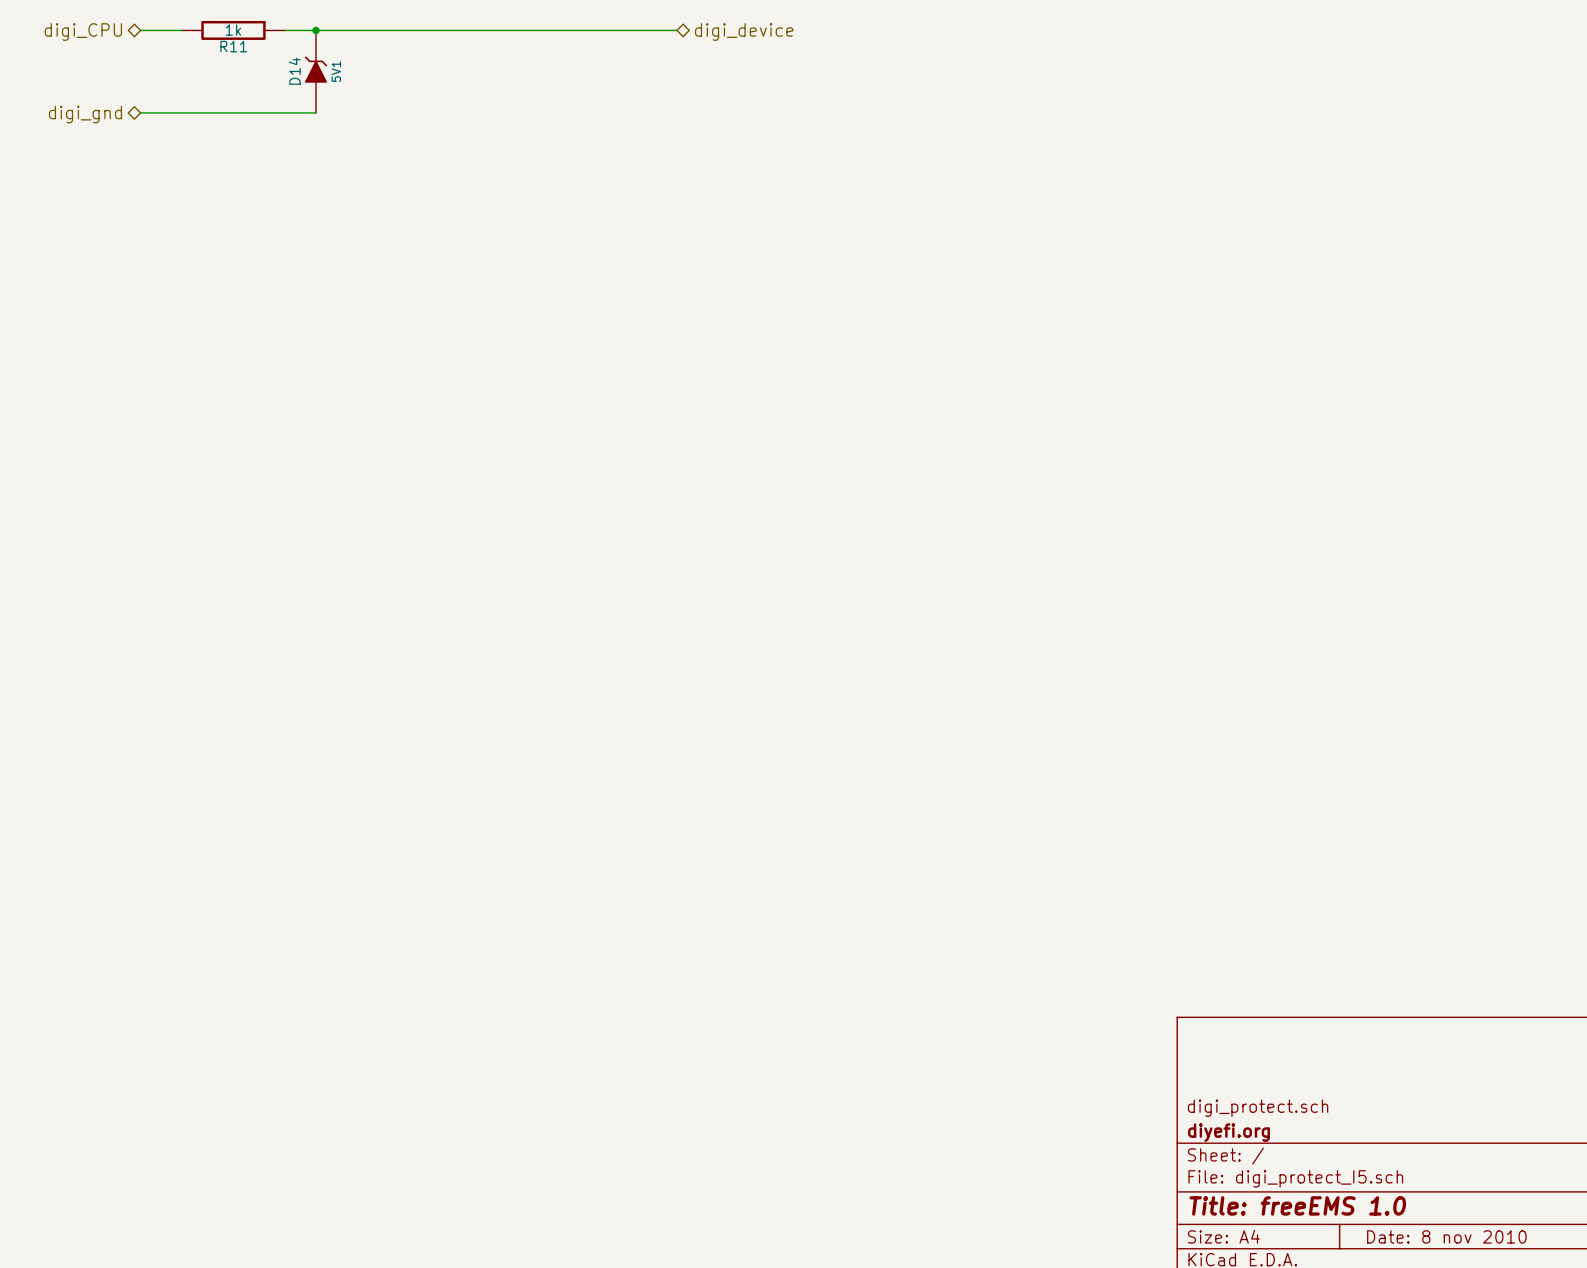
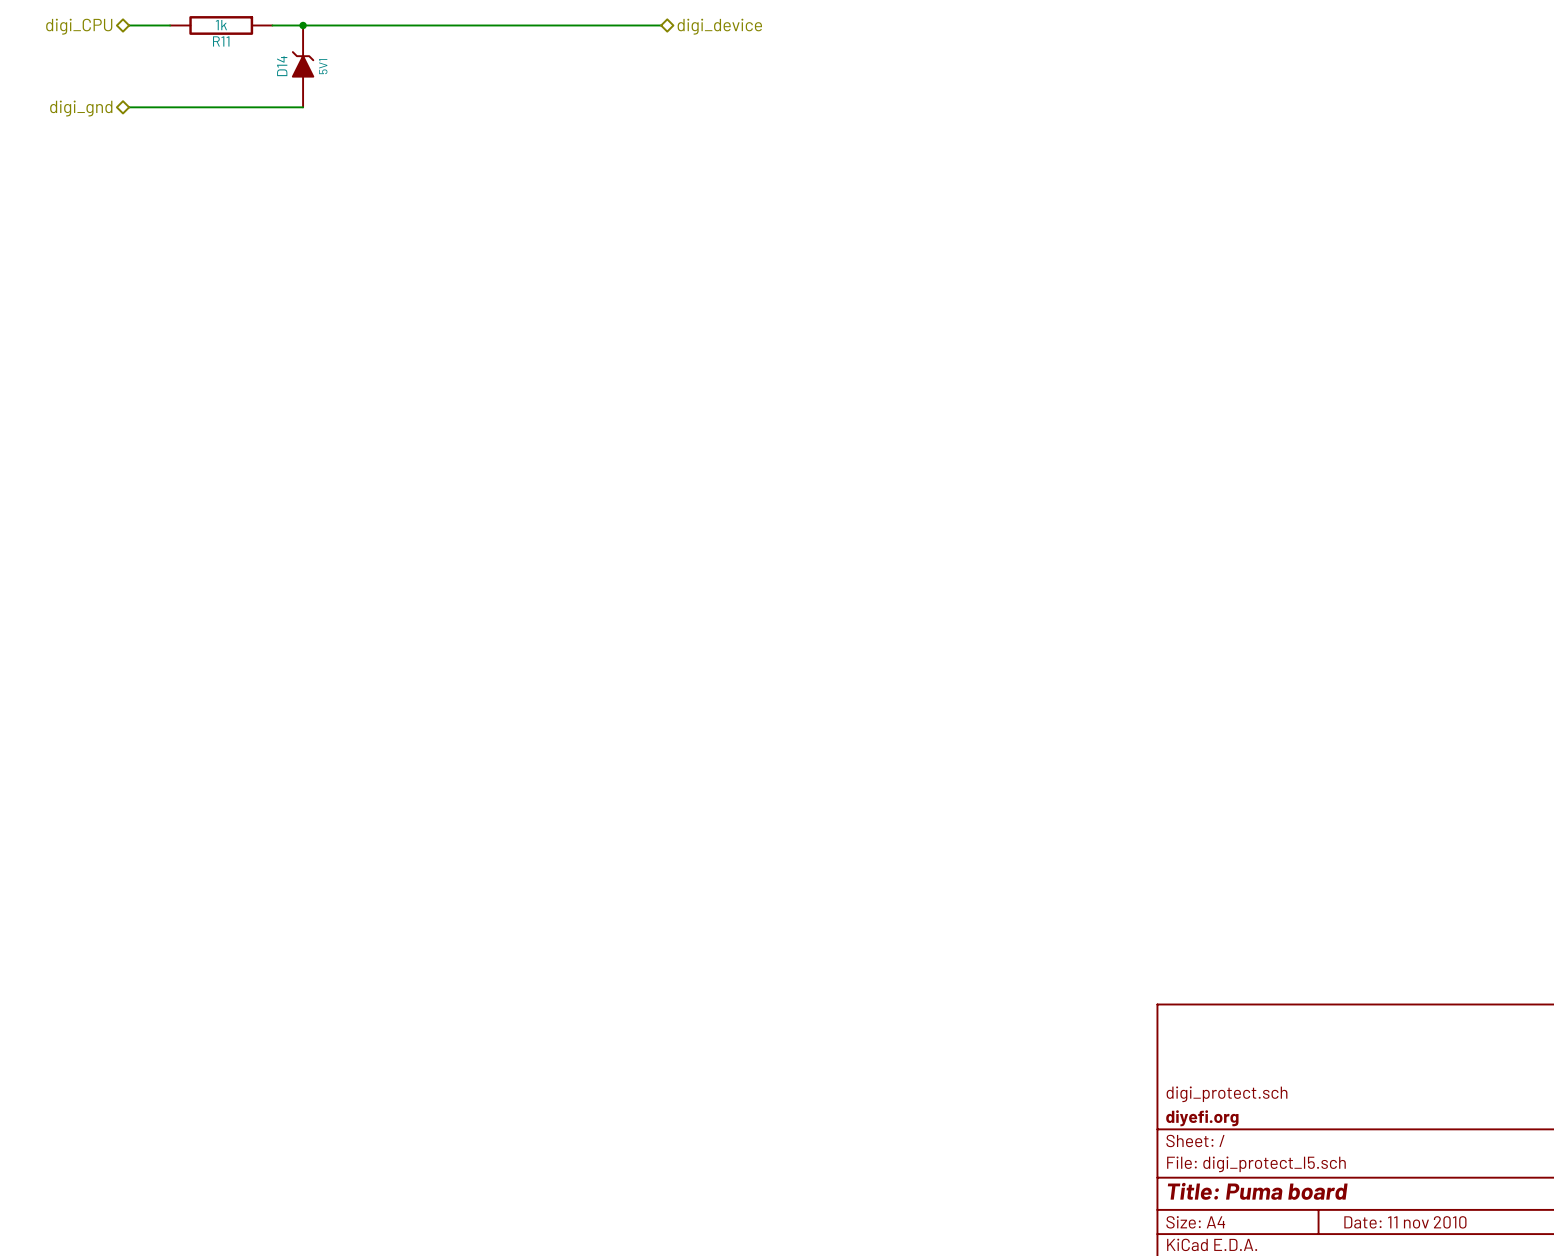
title block: Title: freeEMS 1.0 (1297, 1205) -> Title: Puma board (1257, 1191)
title block: Date: 8 nov 2010 (1446, 1236) -> Date: 11 nov 2010 (1405, 1222)

